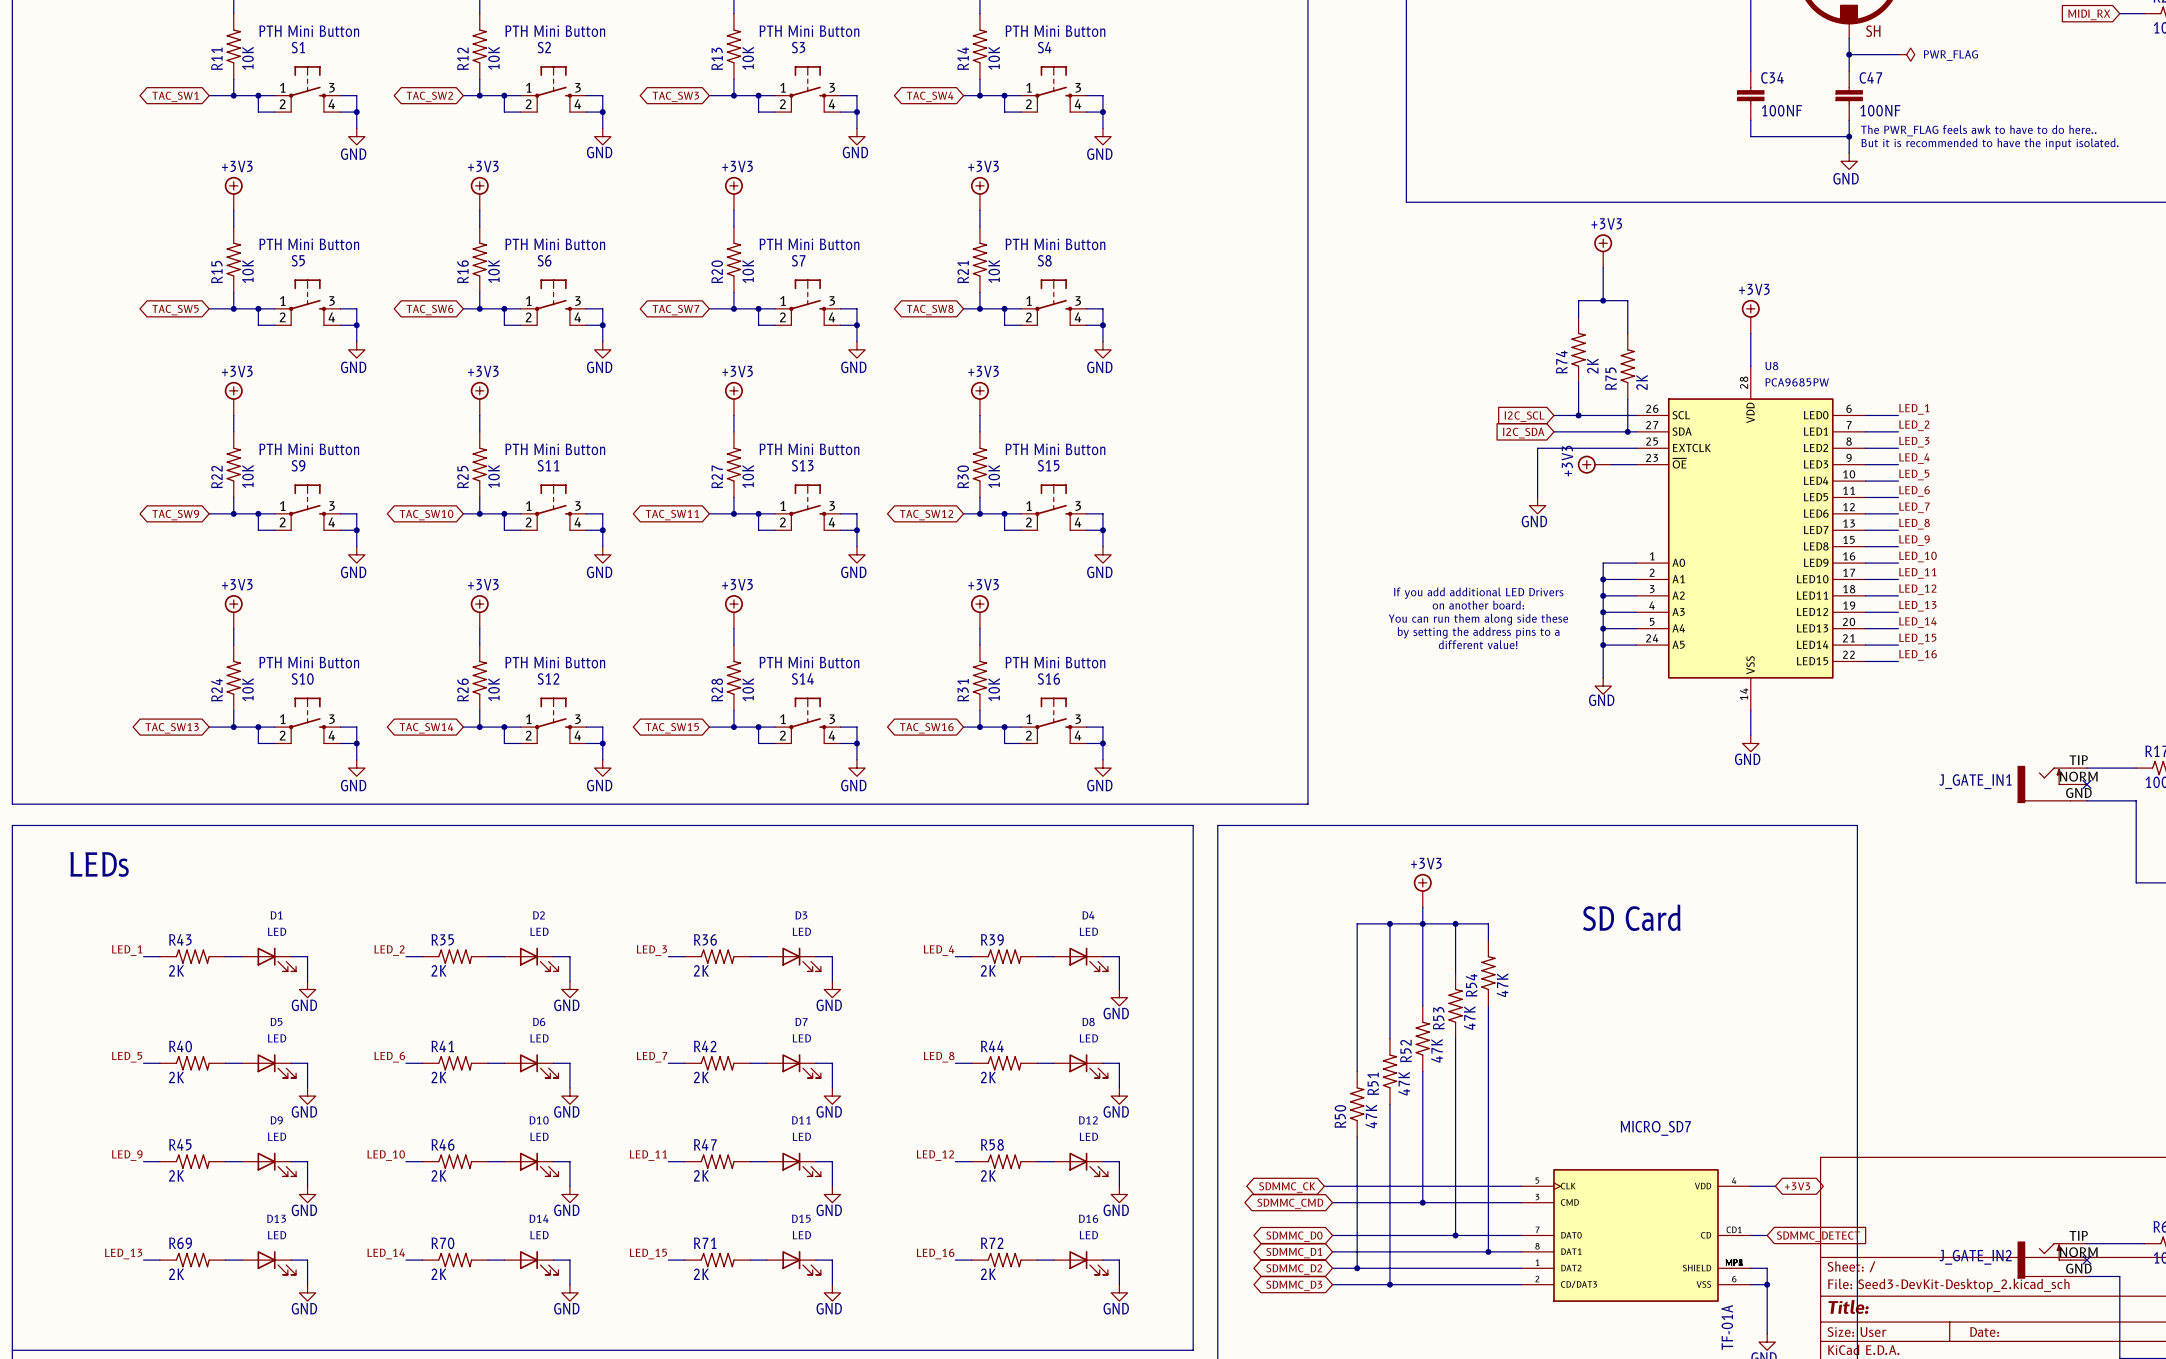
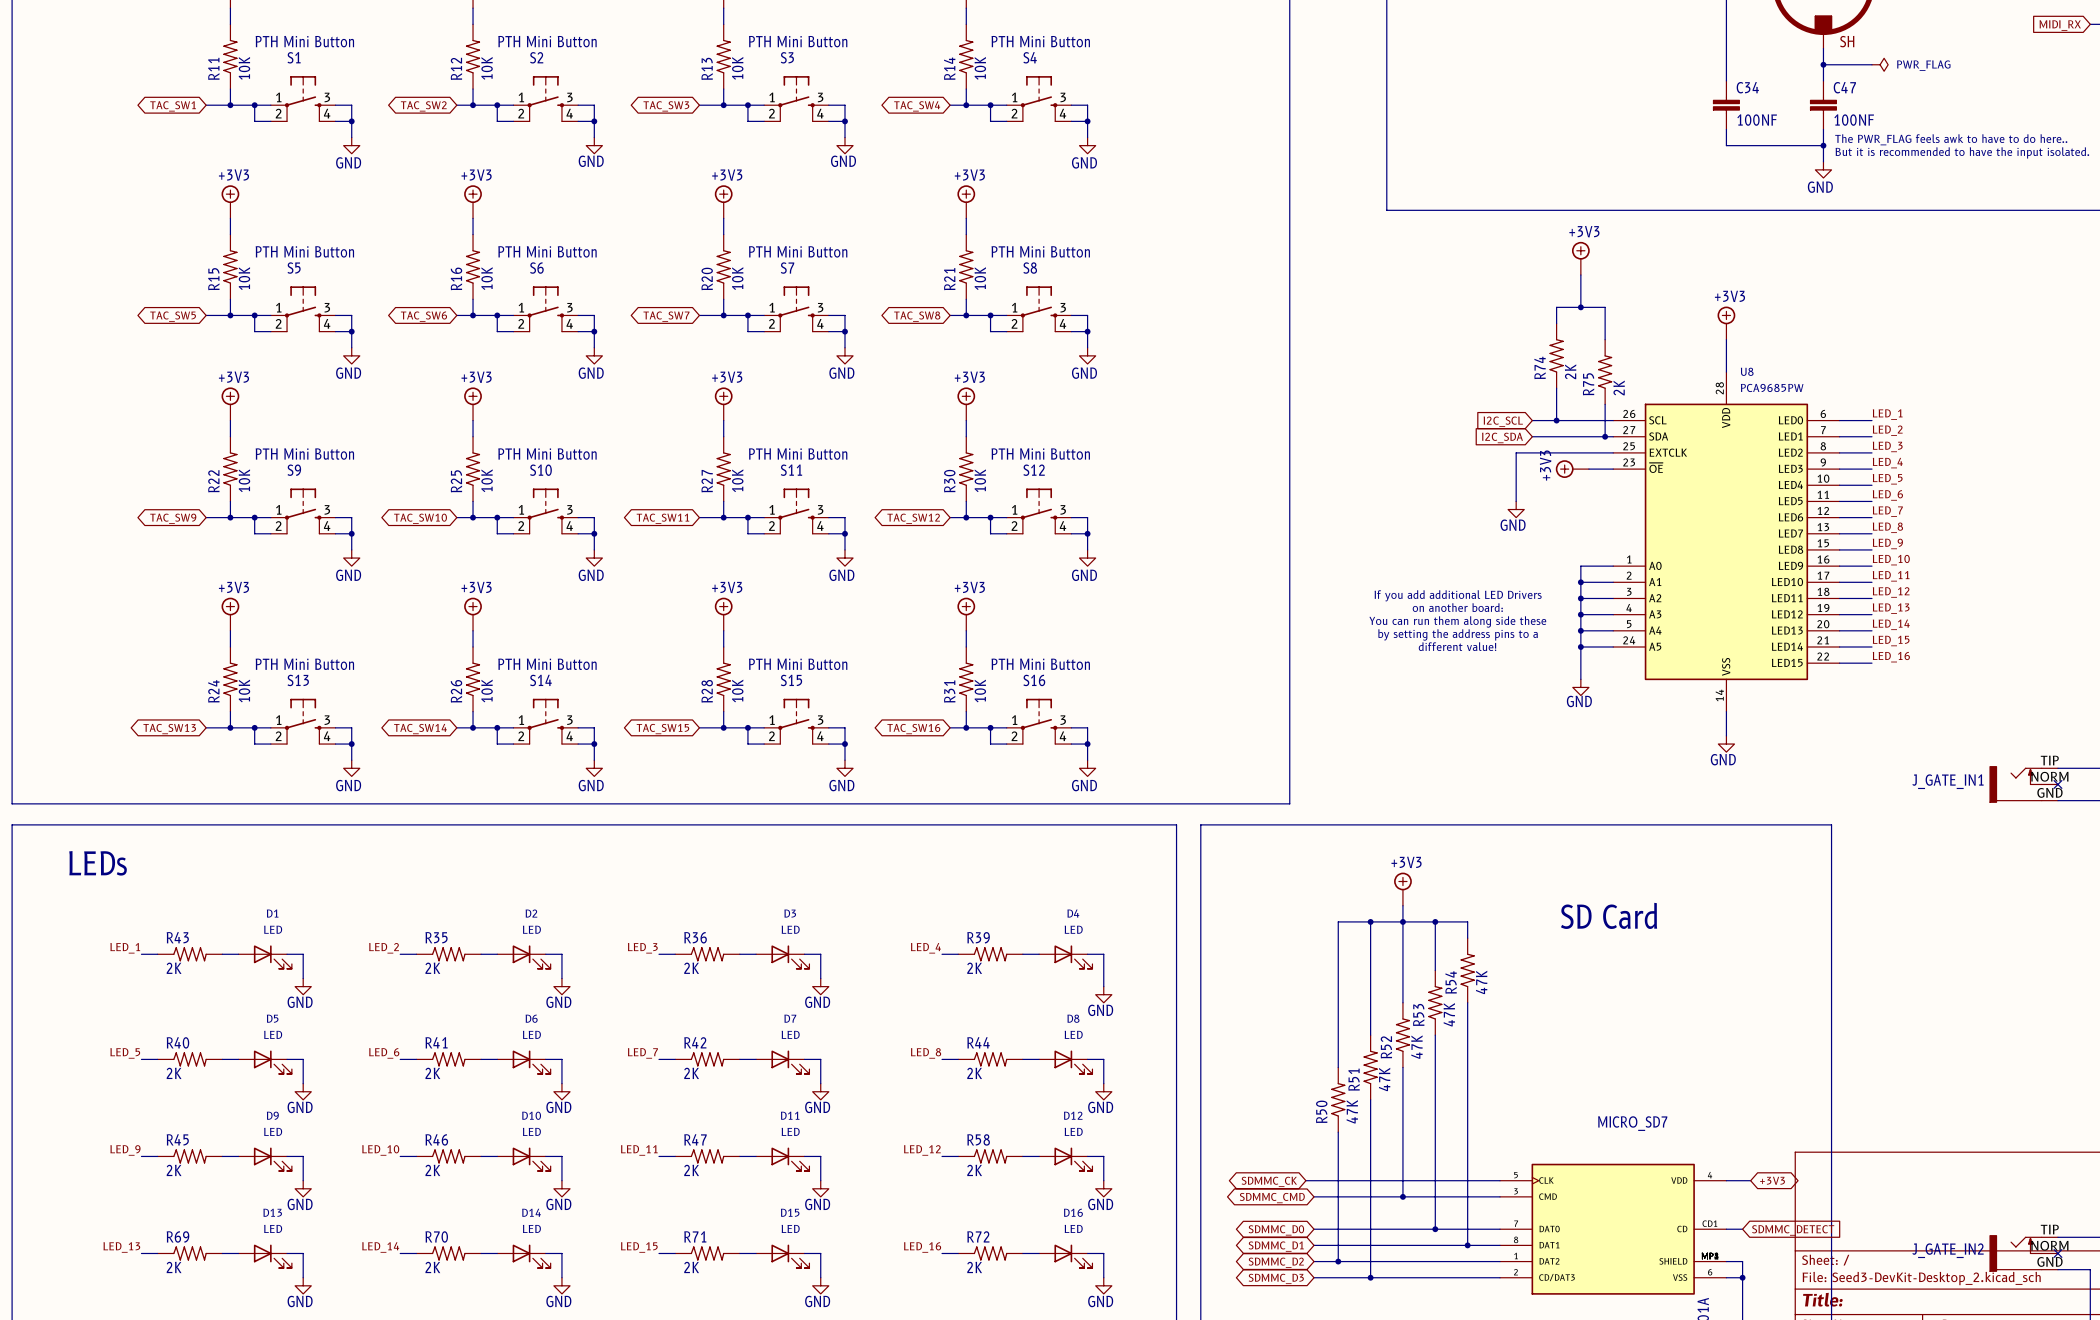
S11 name: S11 (548, 465) -> S10 (540, 470)
S13 name: S13 (802, 465) -> S11 (791, 470)
S15 name: S15 (1048, 465) -> S12 (1034, 470)
S10 name: S10 (302, 678) -> S13 (298, 680)
S12 name: S12 (548, 678) -> S14 (540, 680)
S14 name: S14 (802, 678) -> S15 (791, 680)

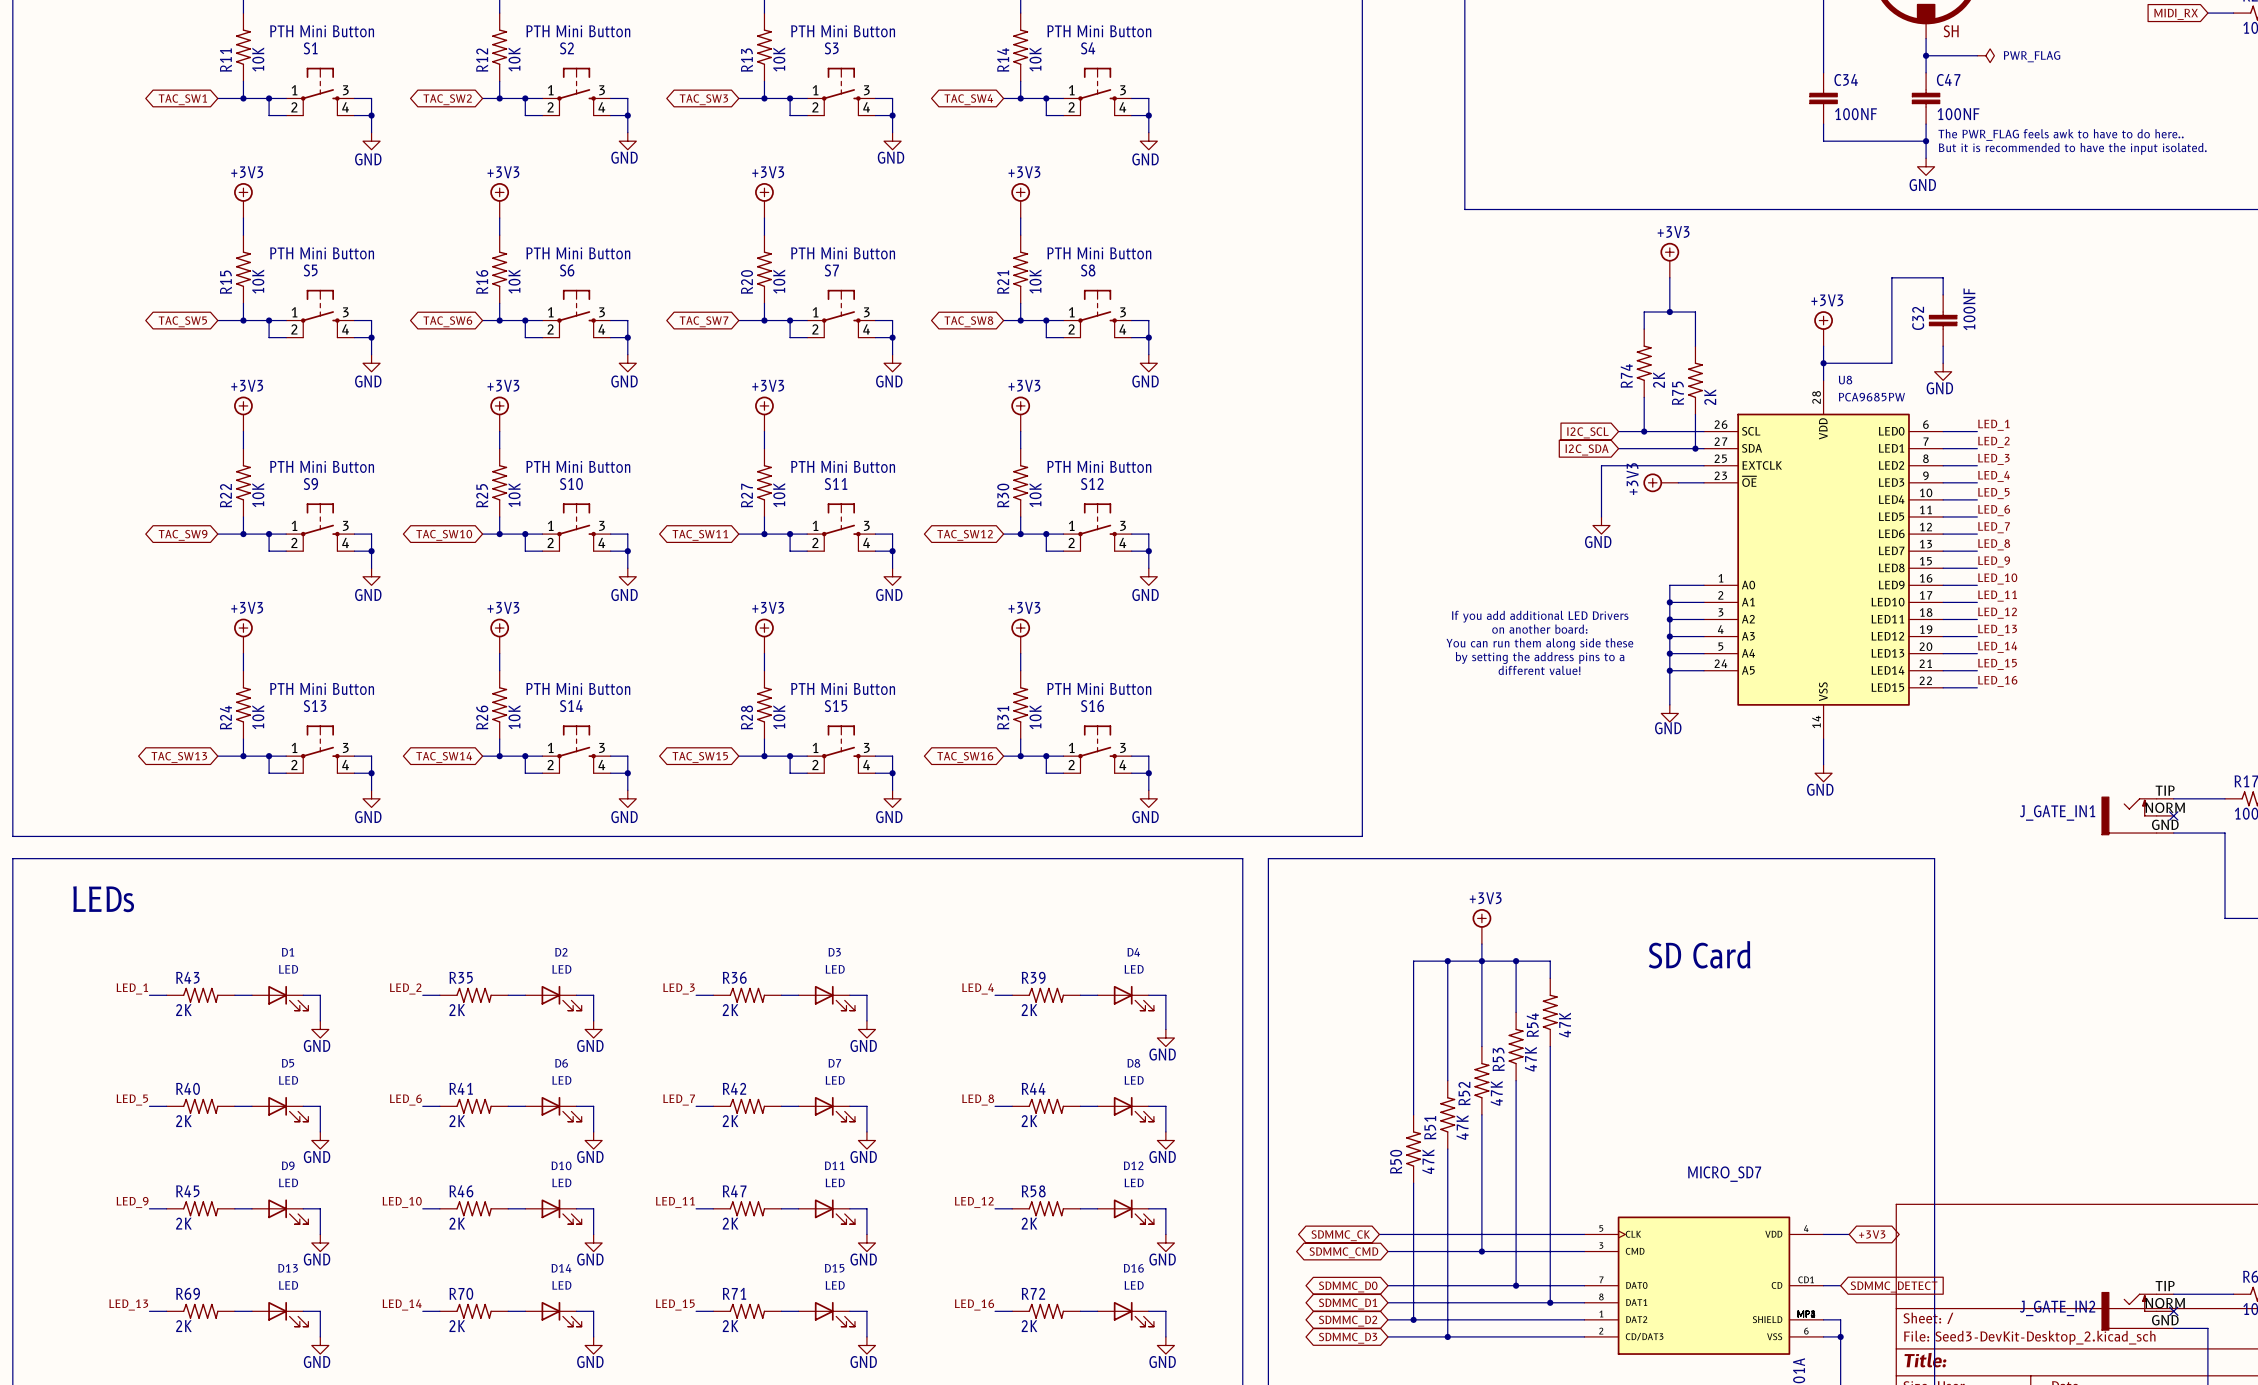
wire: none -> (1943, 294) (1943, 277) (1891, 277) (1891, 363) (1823, 363)
C32: none -> 100NF (1943, 320)
wire: none -> (1943, 346) (1943, 363)
junction: none -> (1823, 363)
power symbol: none -> GND (1943, 371)

